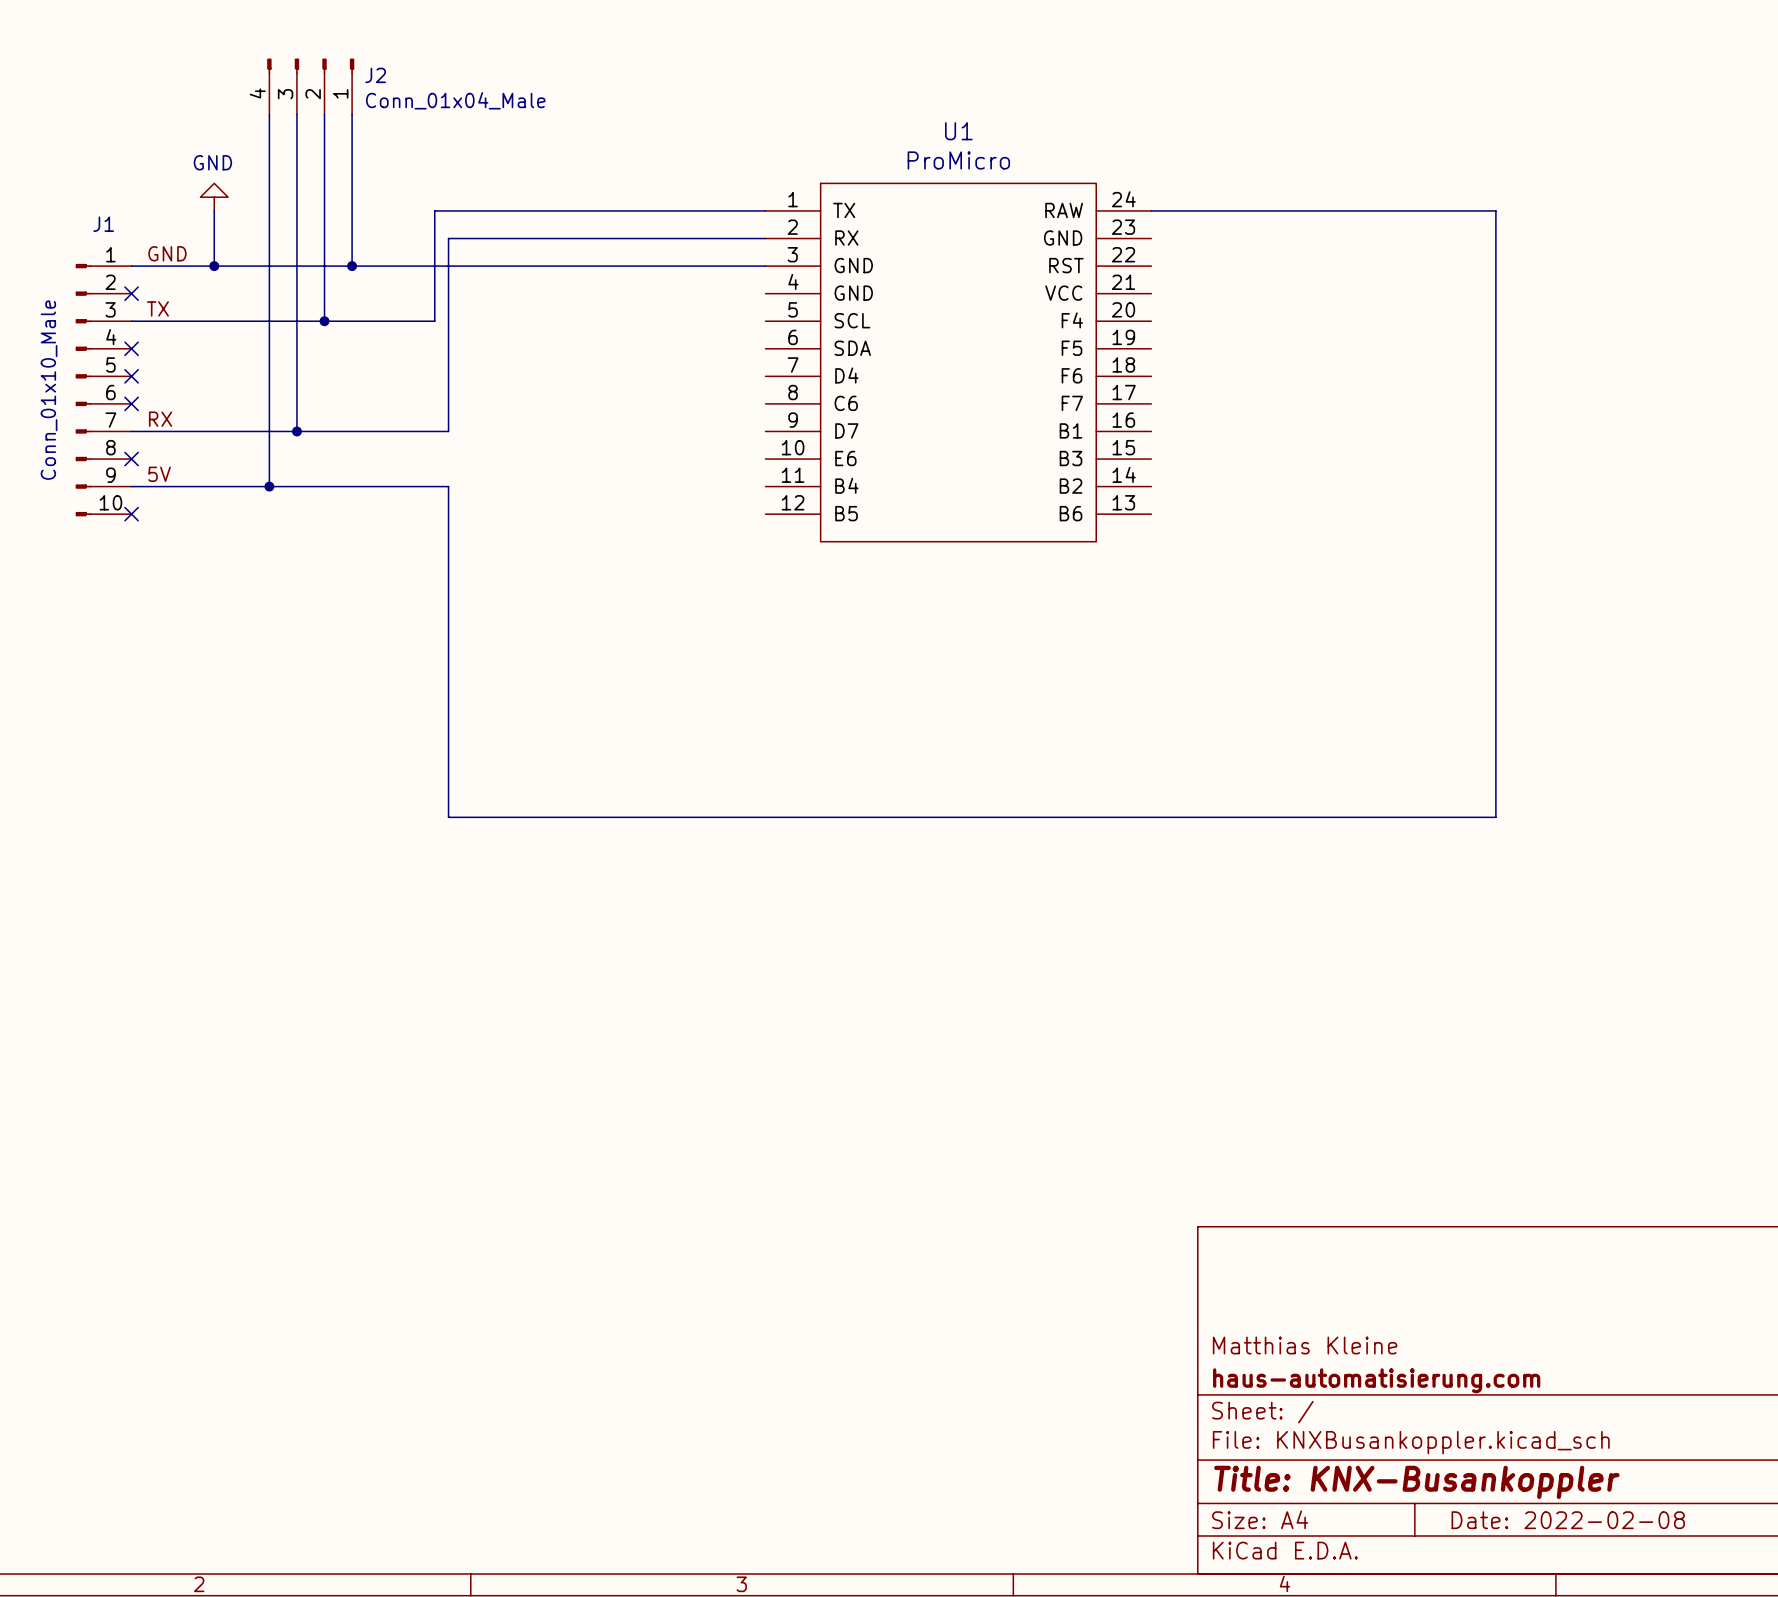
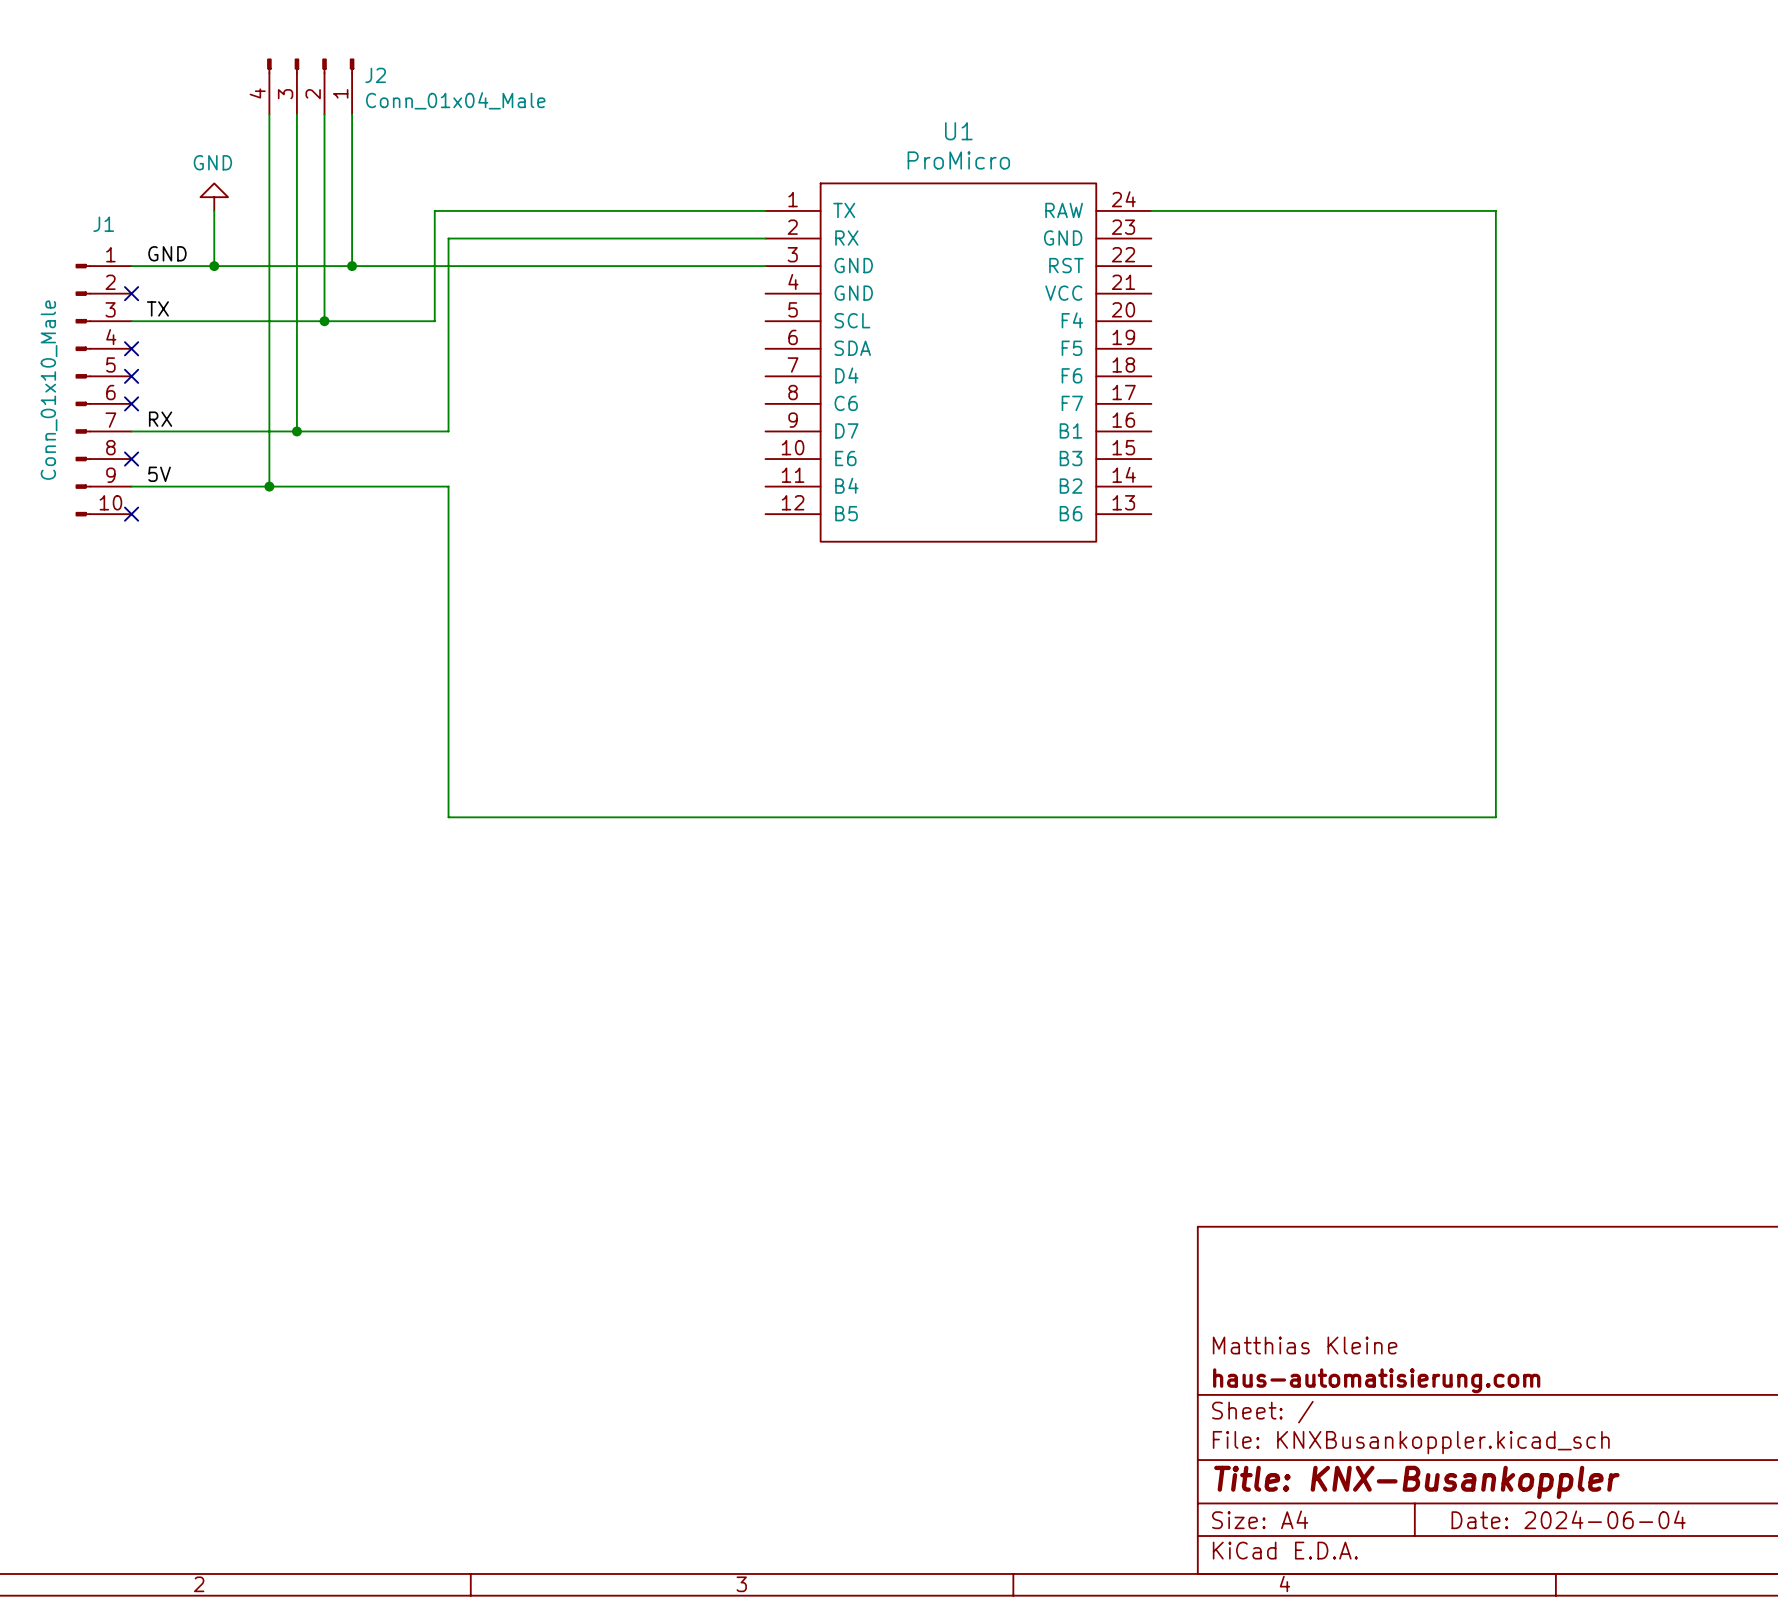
title block: Date: 2022-02-08 (1568, 1520) -> Date: 2024-06-04 (1568, 1519)

